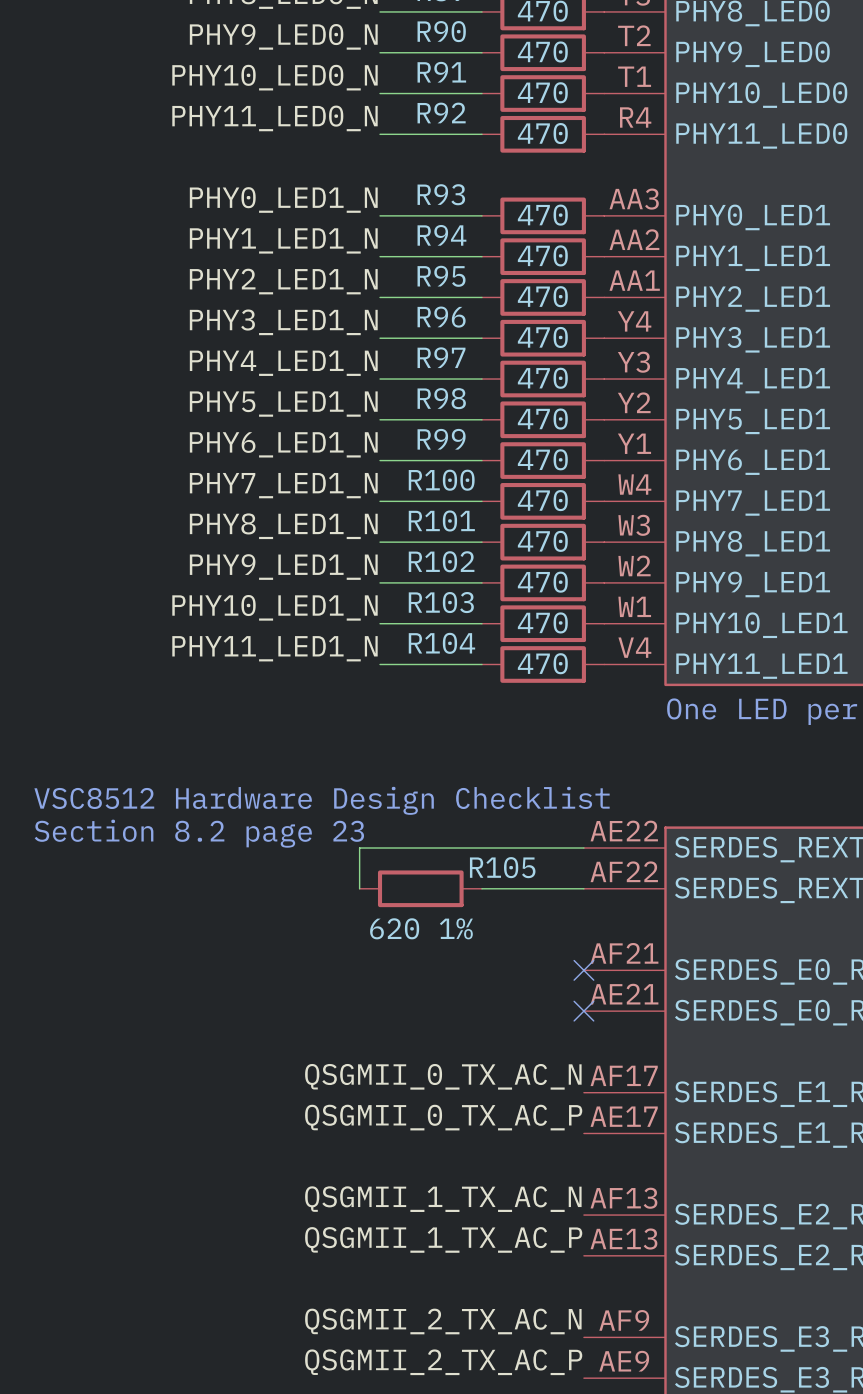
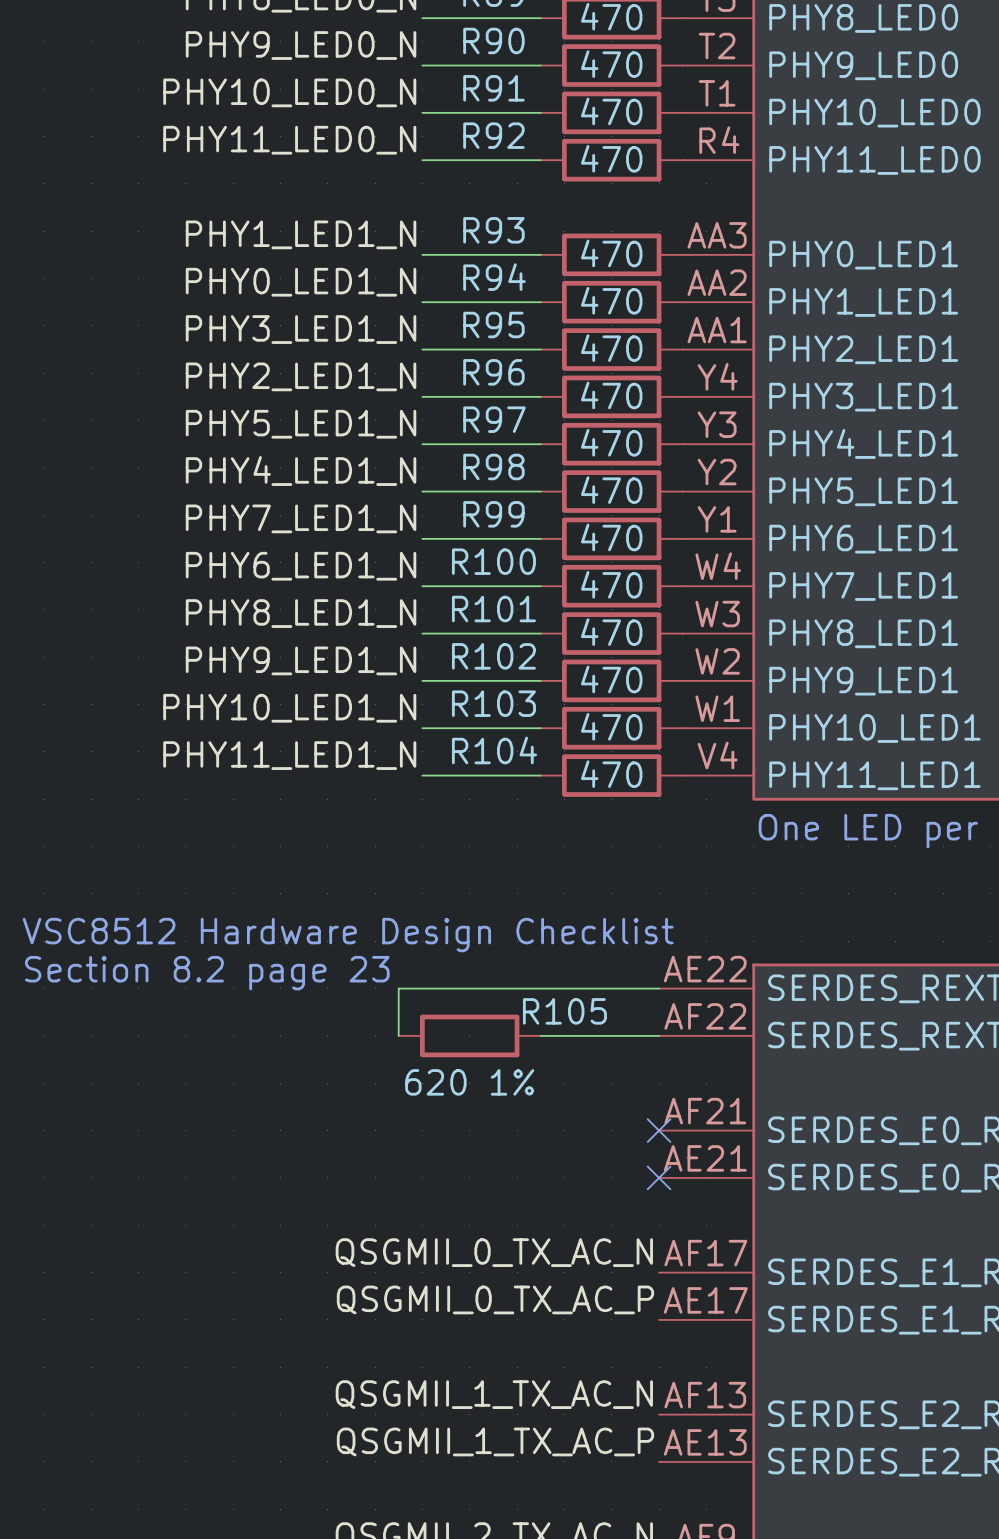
label: PHY0_LED1_N (283, 199) -> PHY1_LED1_N (301, 234)
label: PHY1_LED1_N (283, 240) -> PHY0_LED1_N (301, 282)
label: PHY2_LED1_N (283, 281) -> PHY3_LED1_N (301, 329)
label: PHY3_LED1_N (283, 322) -> PHY2_LED1_N (301, 376)
label: PHY4_LED1_N (283, 363) -> PHY5_LED1_N (301, 424)
label: PHY5_LED1_N (283, 404) -> PHY4_LED1_N (301, 471)
label: PHY6_LED1_N (283, 444) -> PHY7_LED1_N (301, 518)
label: PHY7_LED1_N (283, 485) -> PHY6_LED1_N (301, 566)

